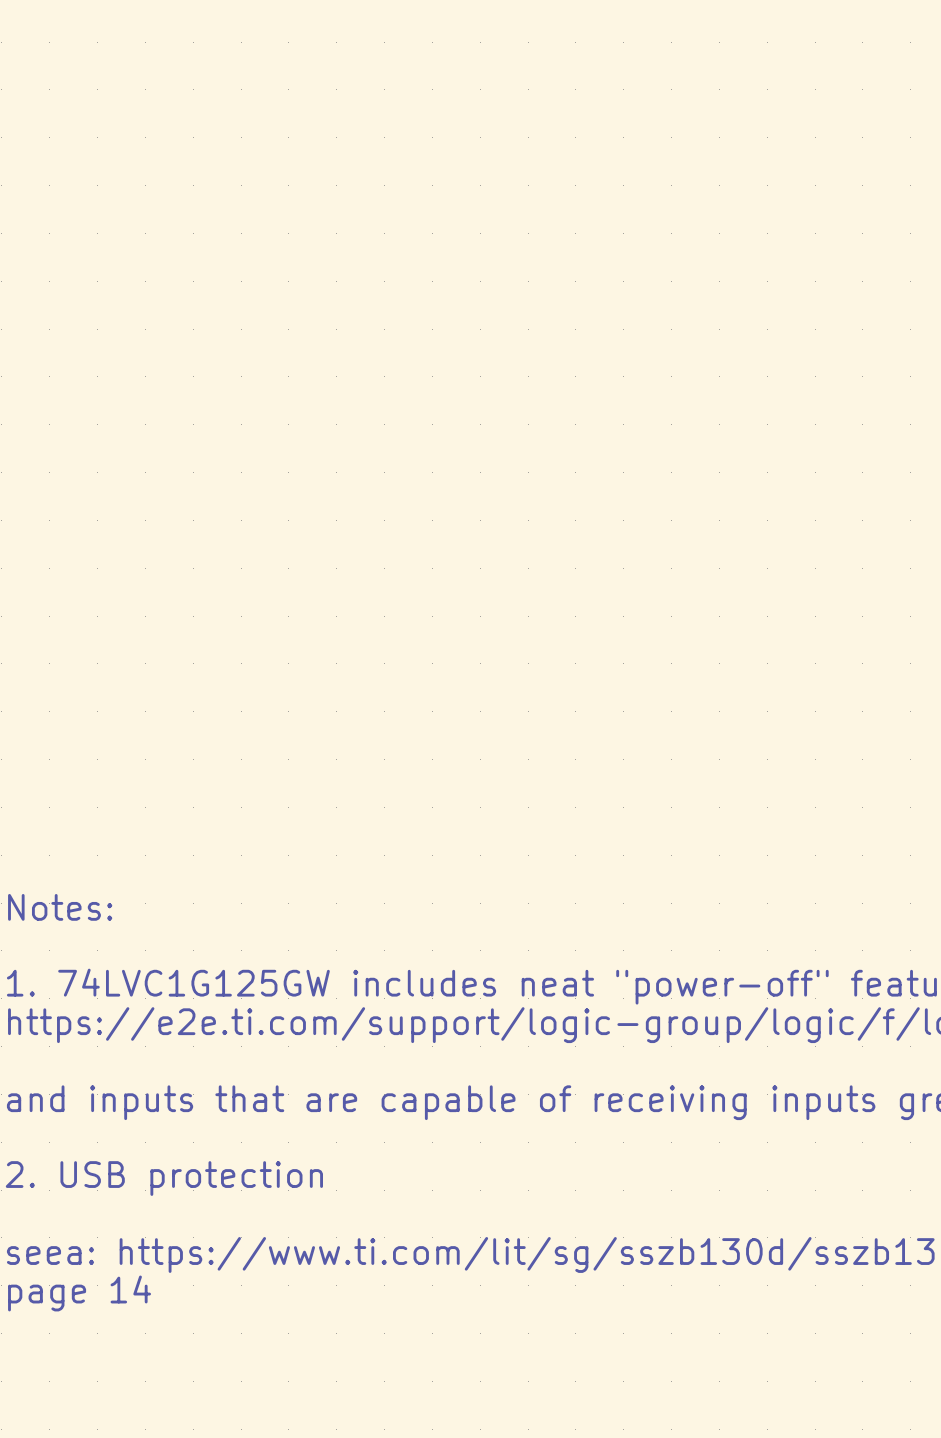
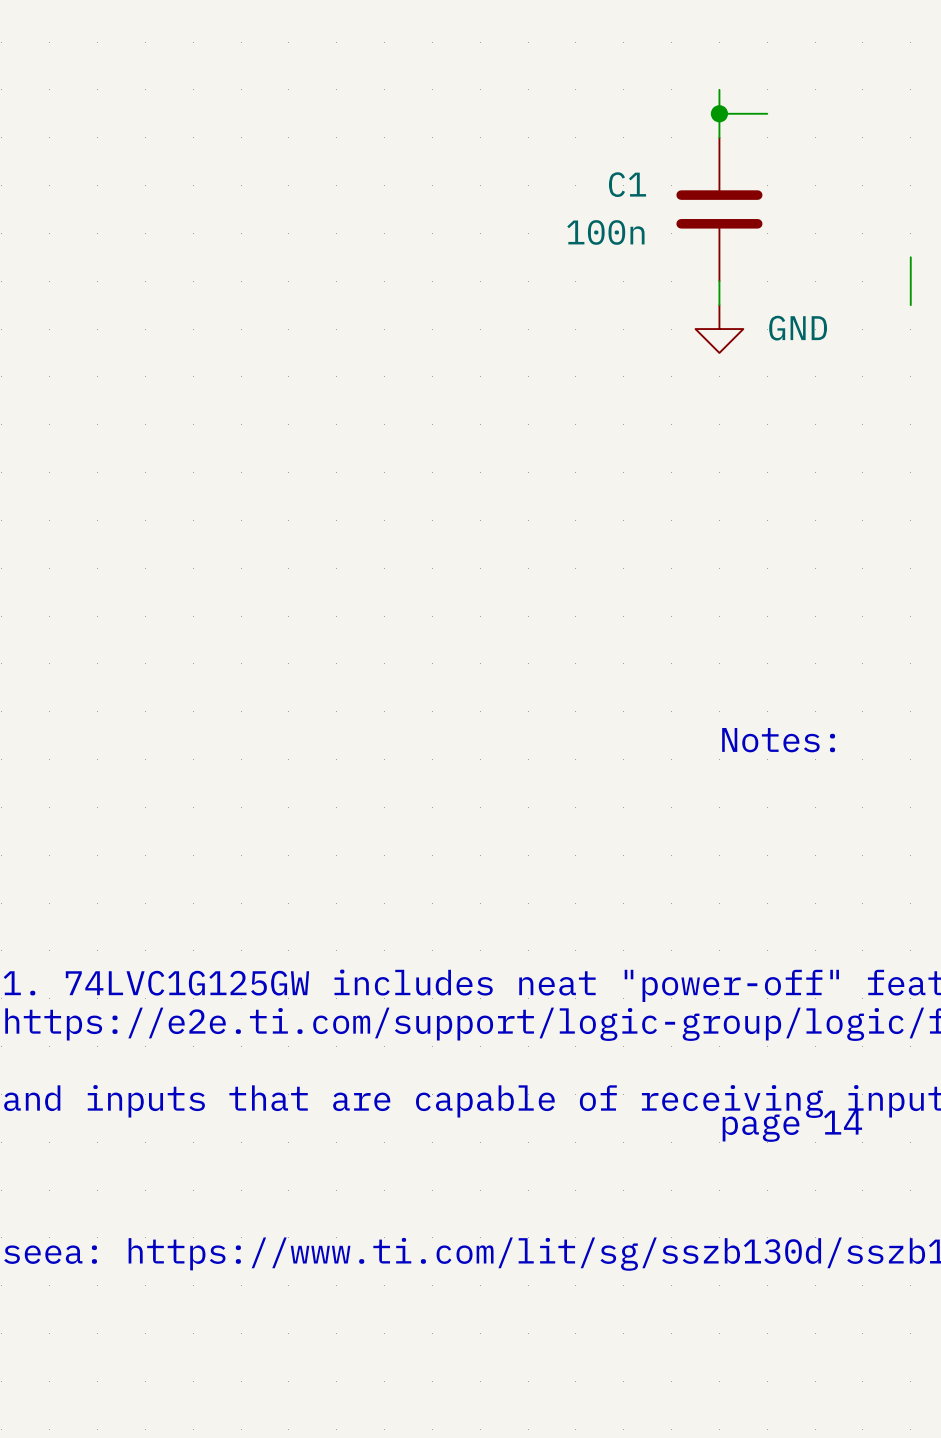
wire: none -> (719, 89) (719, 137)
wire: none -> (719, 113) (767, 113)
junction: none -> (719, 113)
C1: none -> (719, 209)
wire: none -> (910, 257) (910, 305)
wire: none -> (719, 281) (719, 305)
power symbol: none -> GND (719, 329)
text: none -> Notes: (778, 740)
text: Notes: (60, 907) -> none
text: none -> page 14 (792, 1126)
text: 2. USB protection (164, 1178) -> none
text: page 14 (79, 1293) -> none

